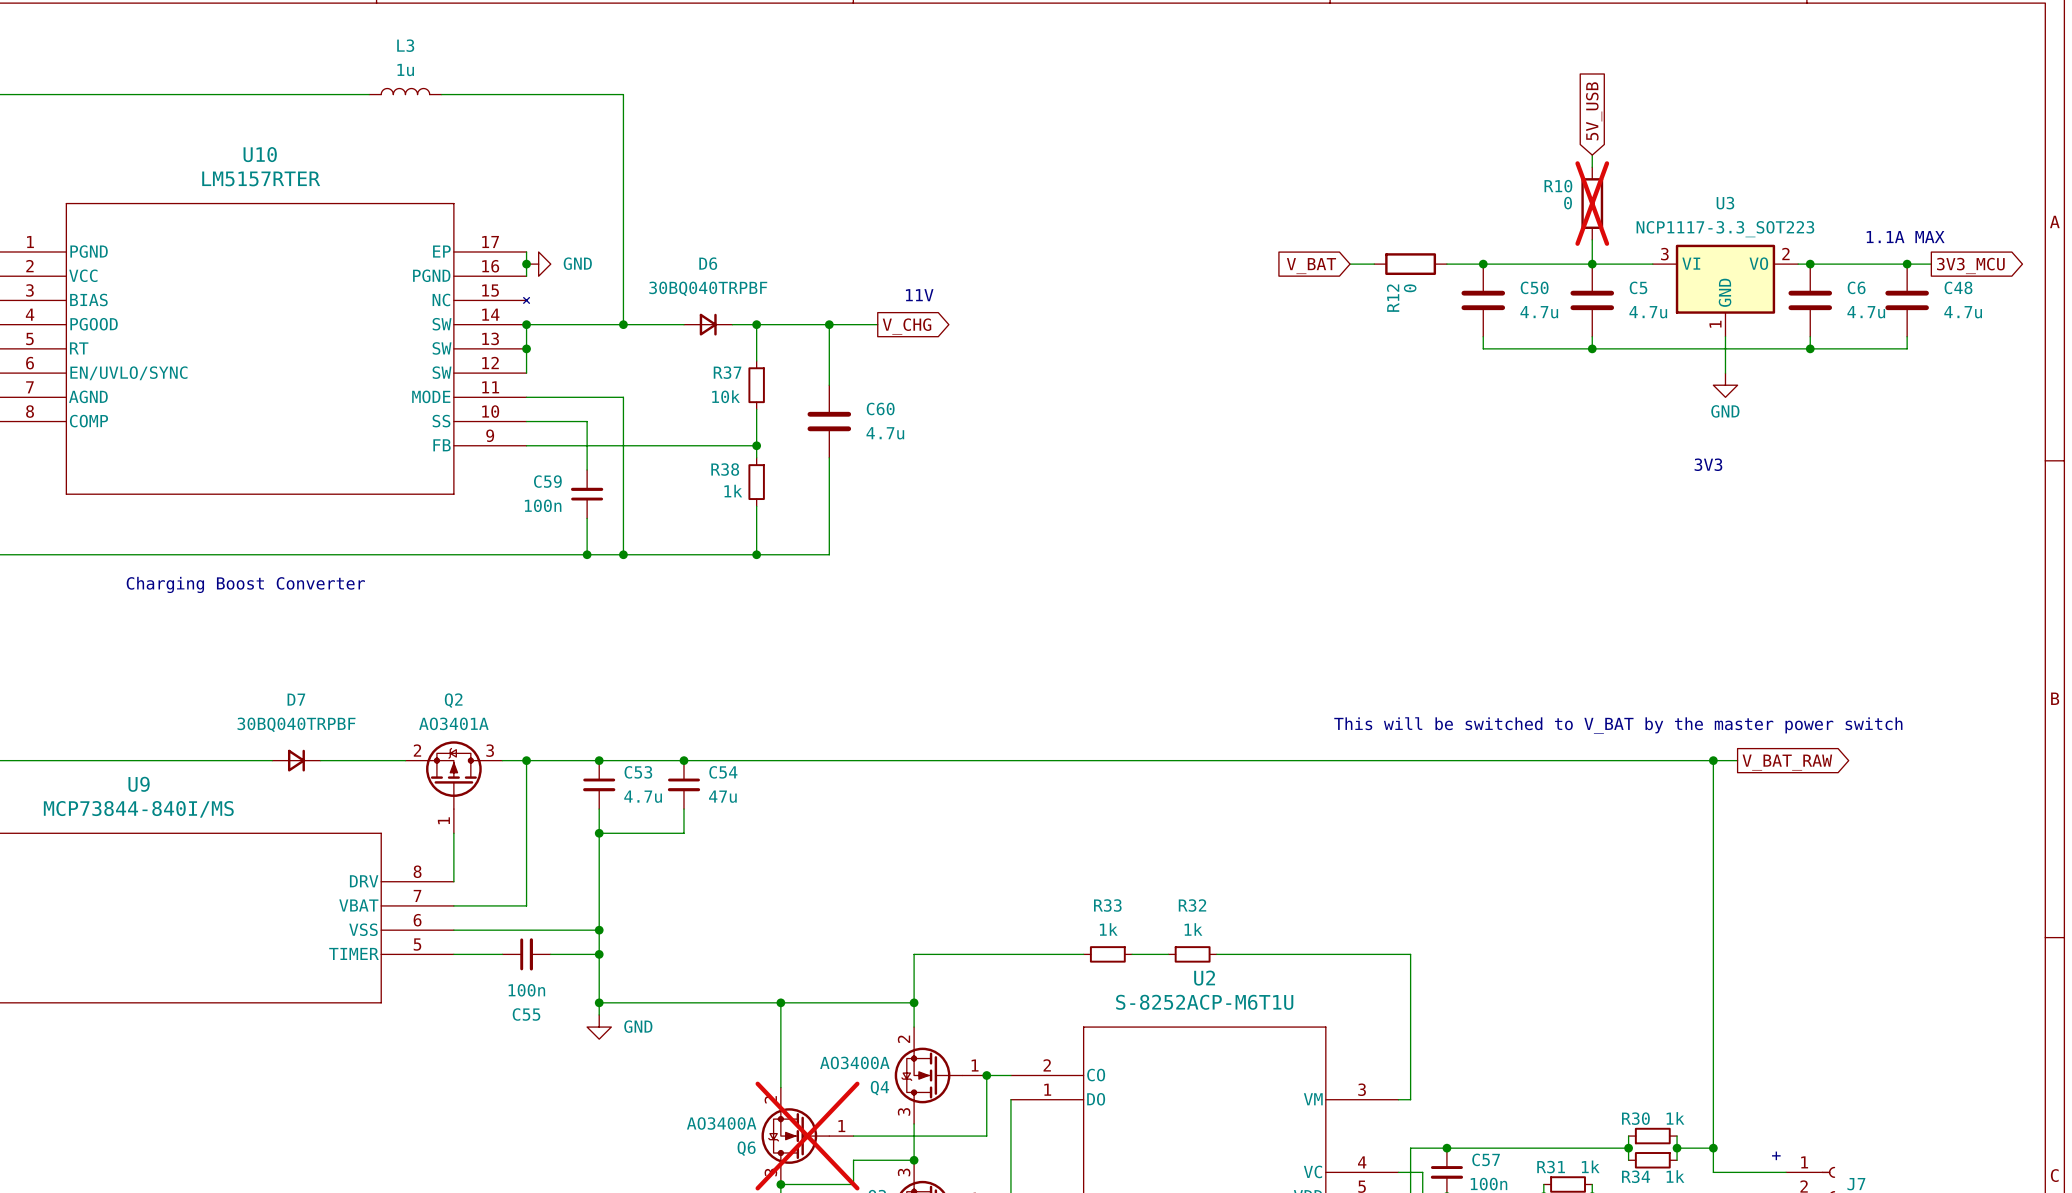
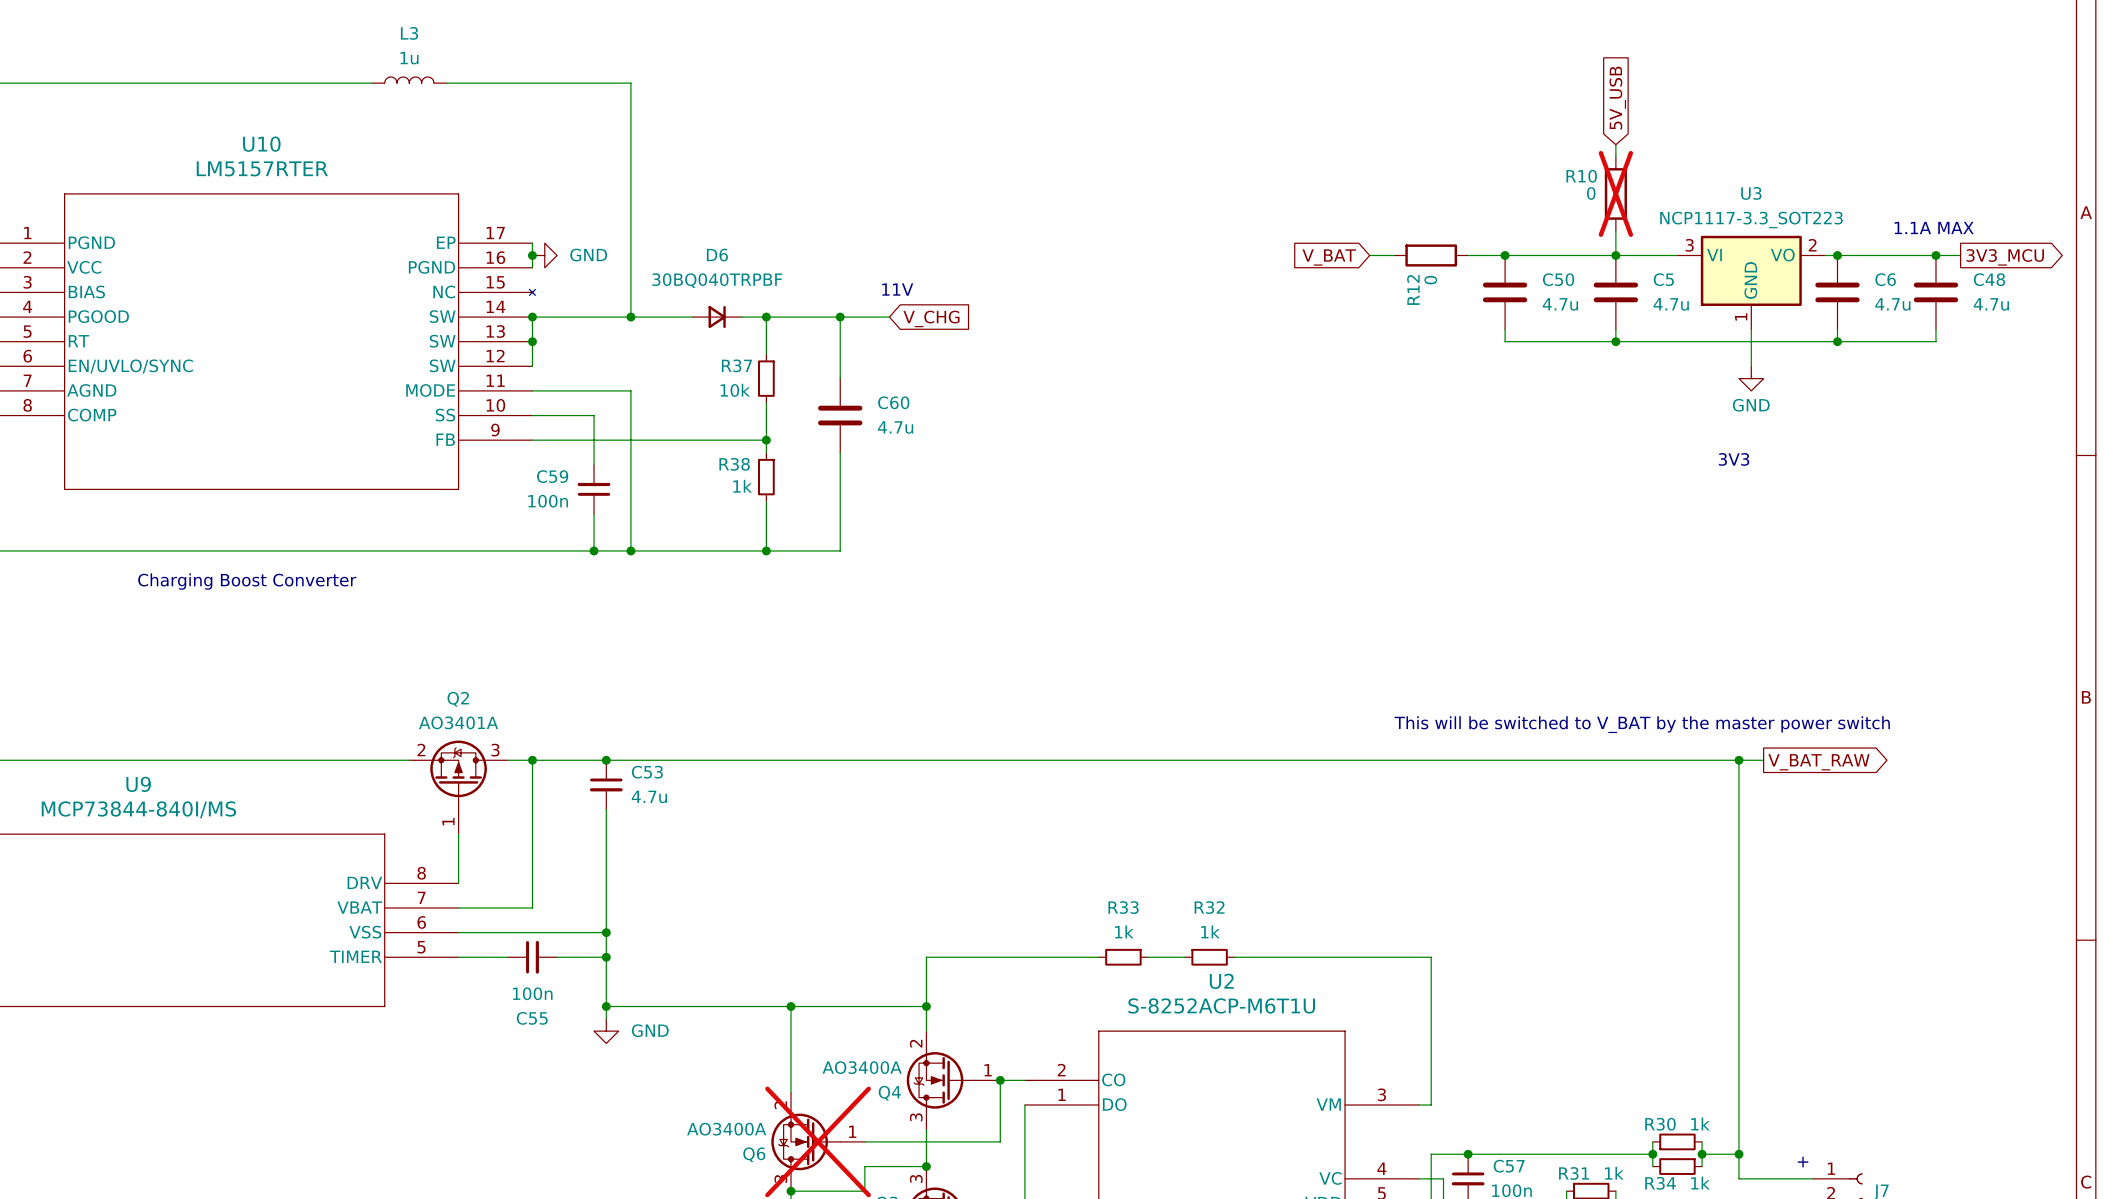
text position: 11V (919, 295) -> 11V (897, 289)
global label shape: output (907, 326) -> input (931, 318)
D7: 30BQ040TRPBF (296, 760) -> none
junction: (683, 760) -> none
C54: 47u (683, 784) -> none
wire: (683, 809) (683, 833) (599, 833) -> none
junction: (599, 833) -> none

